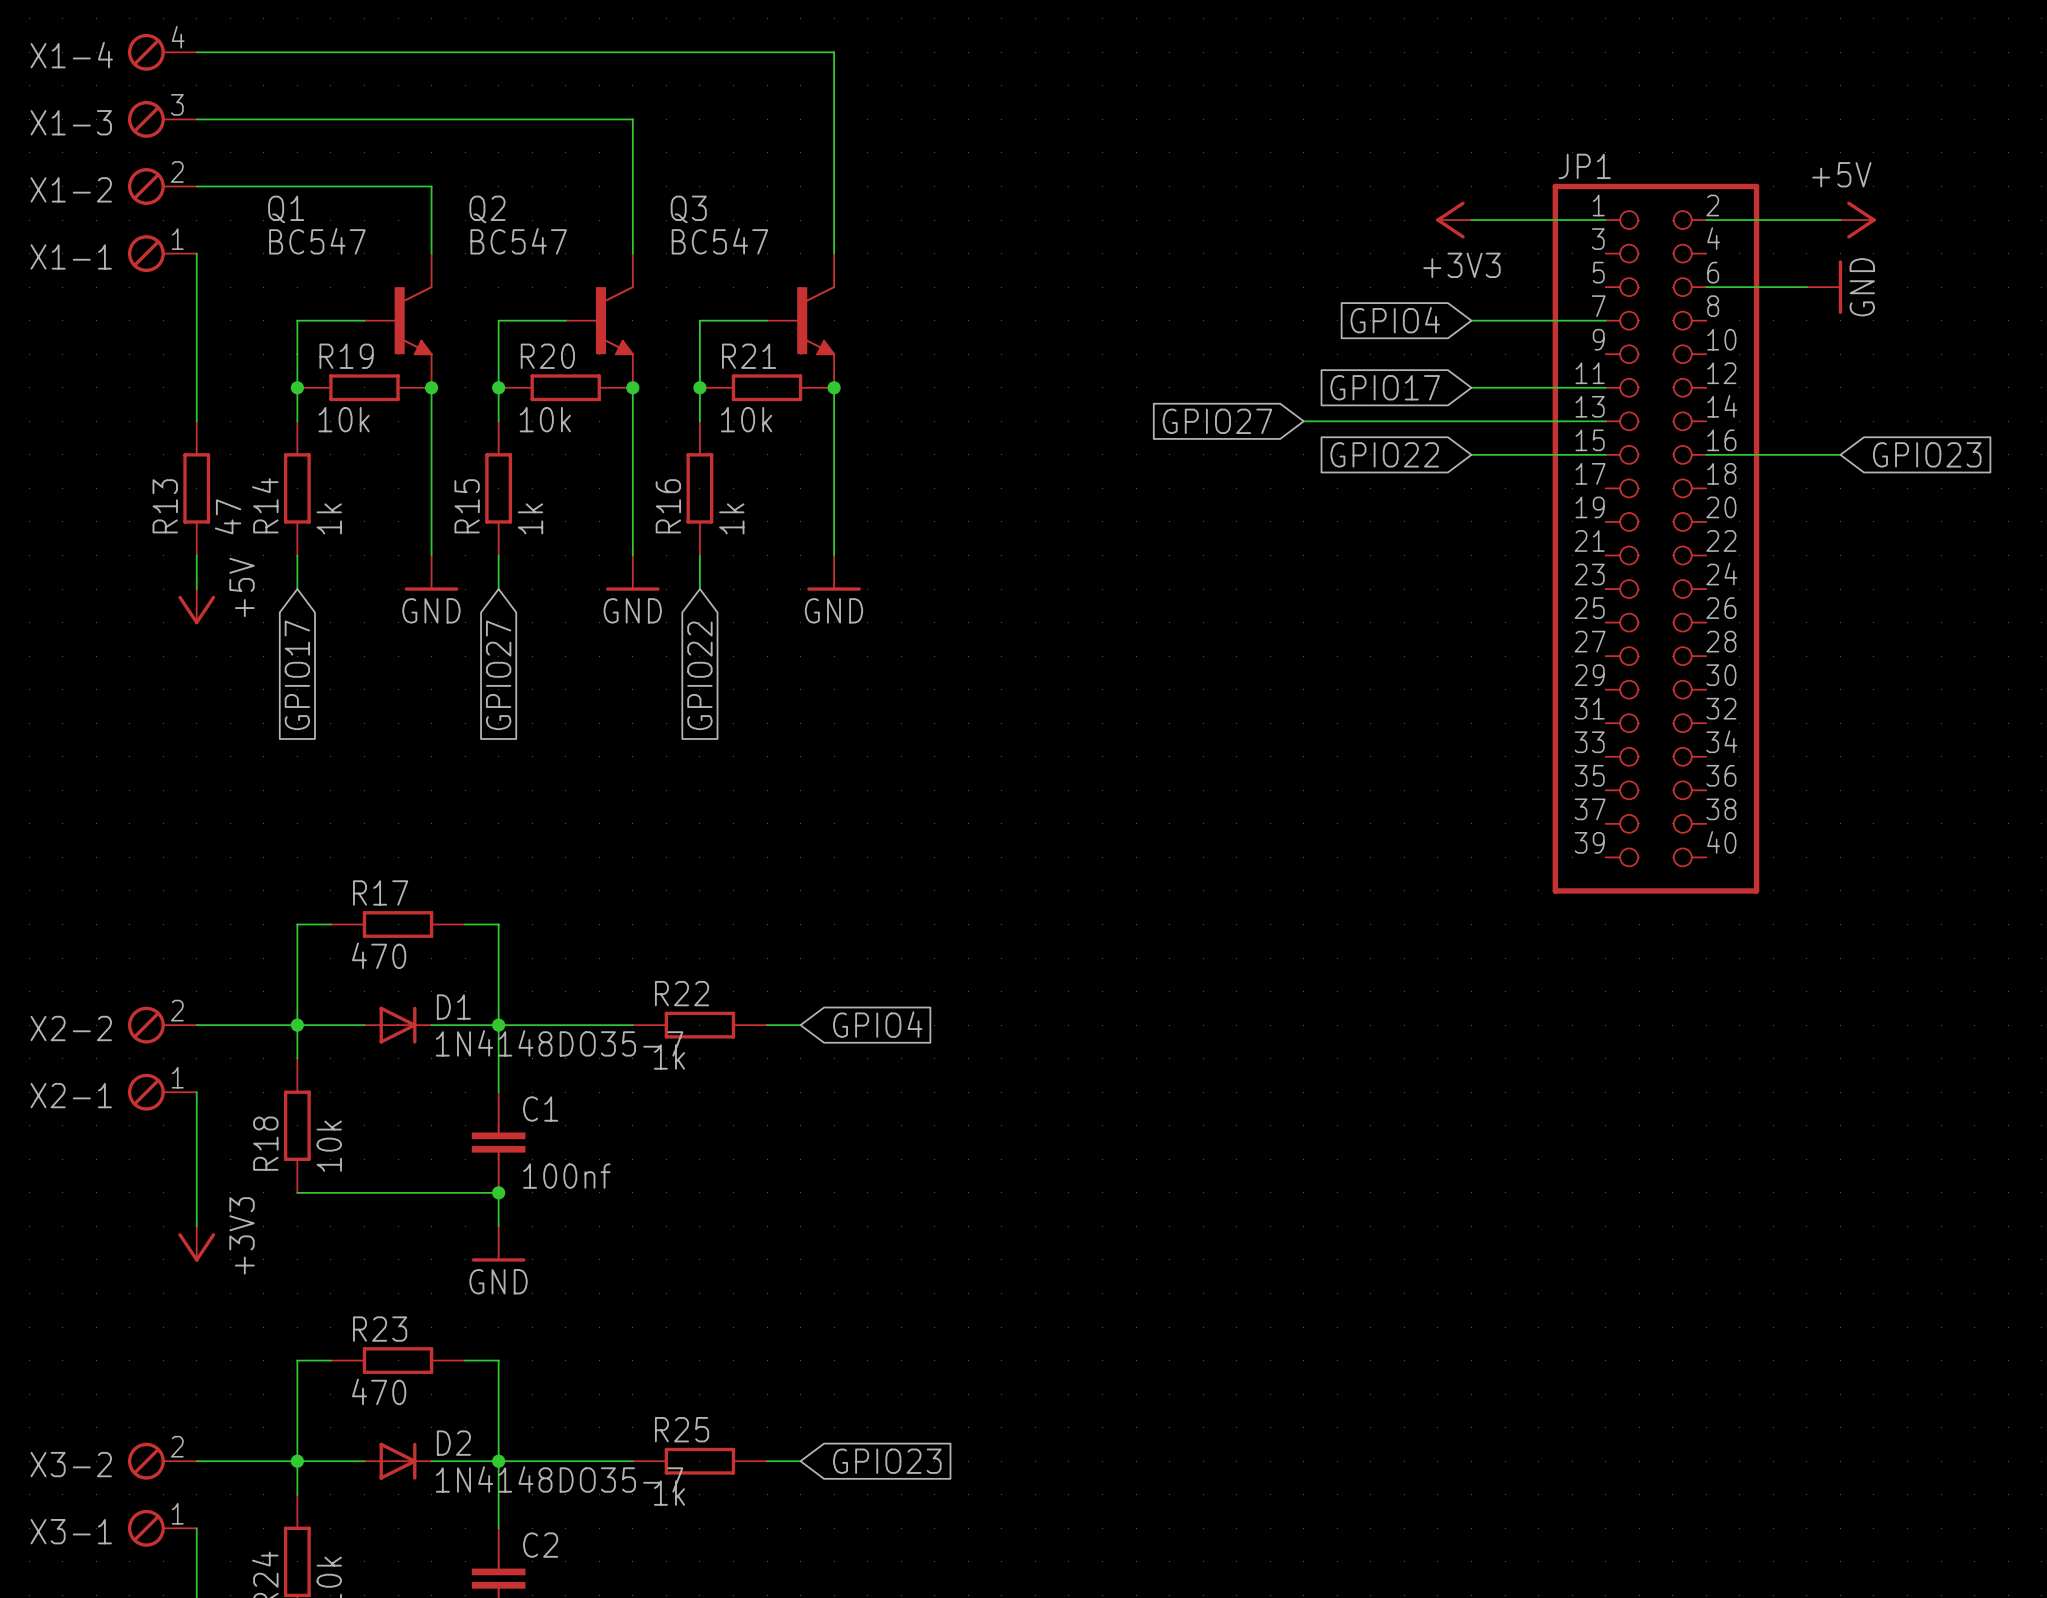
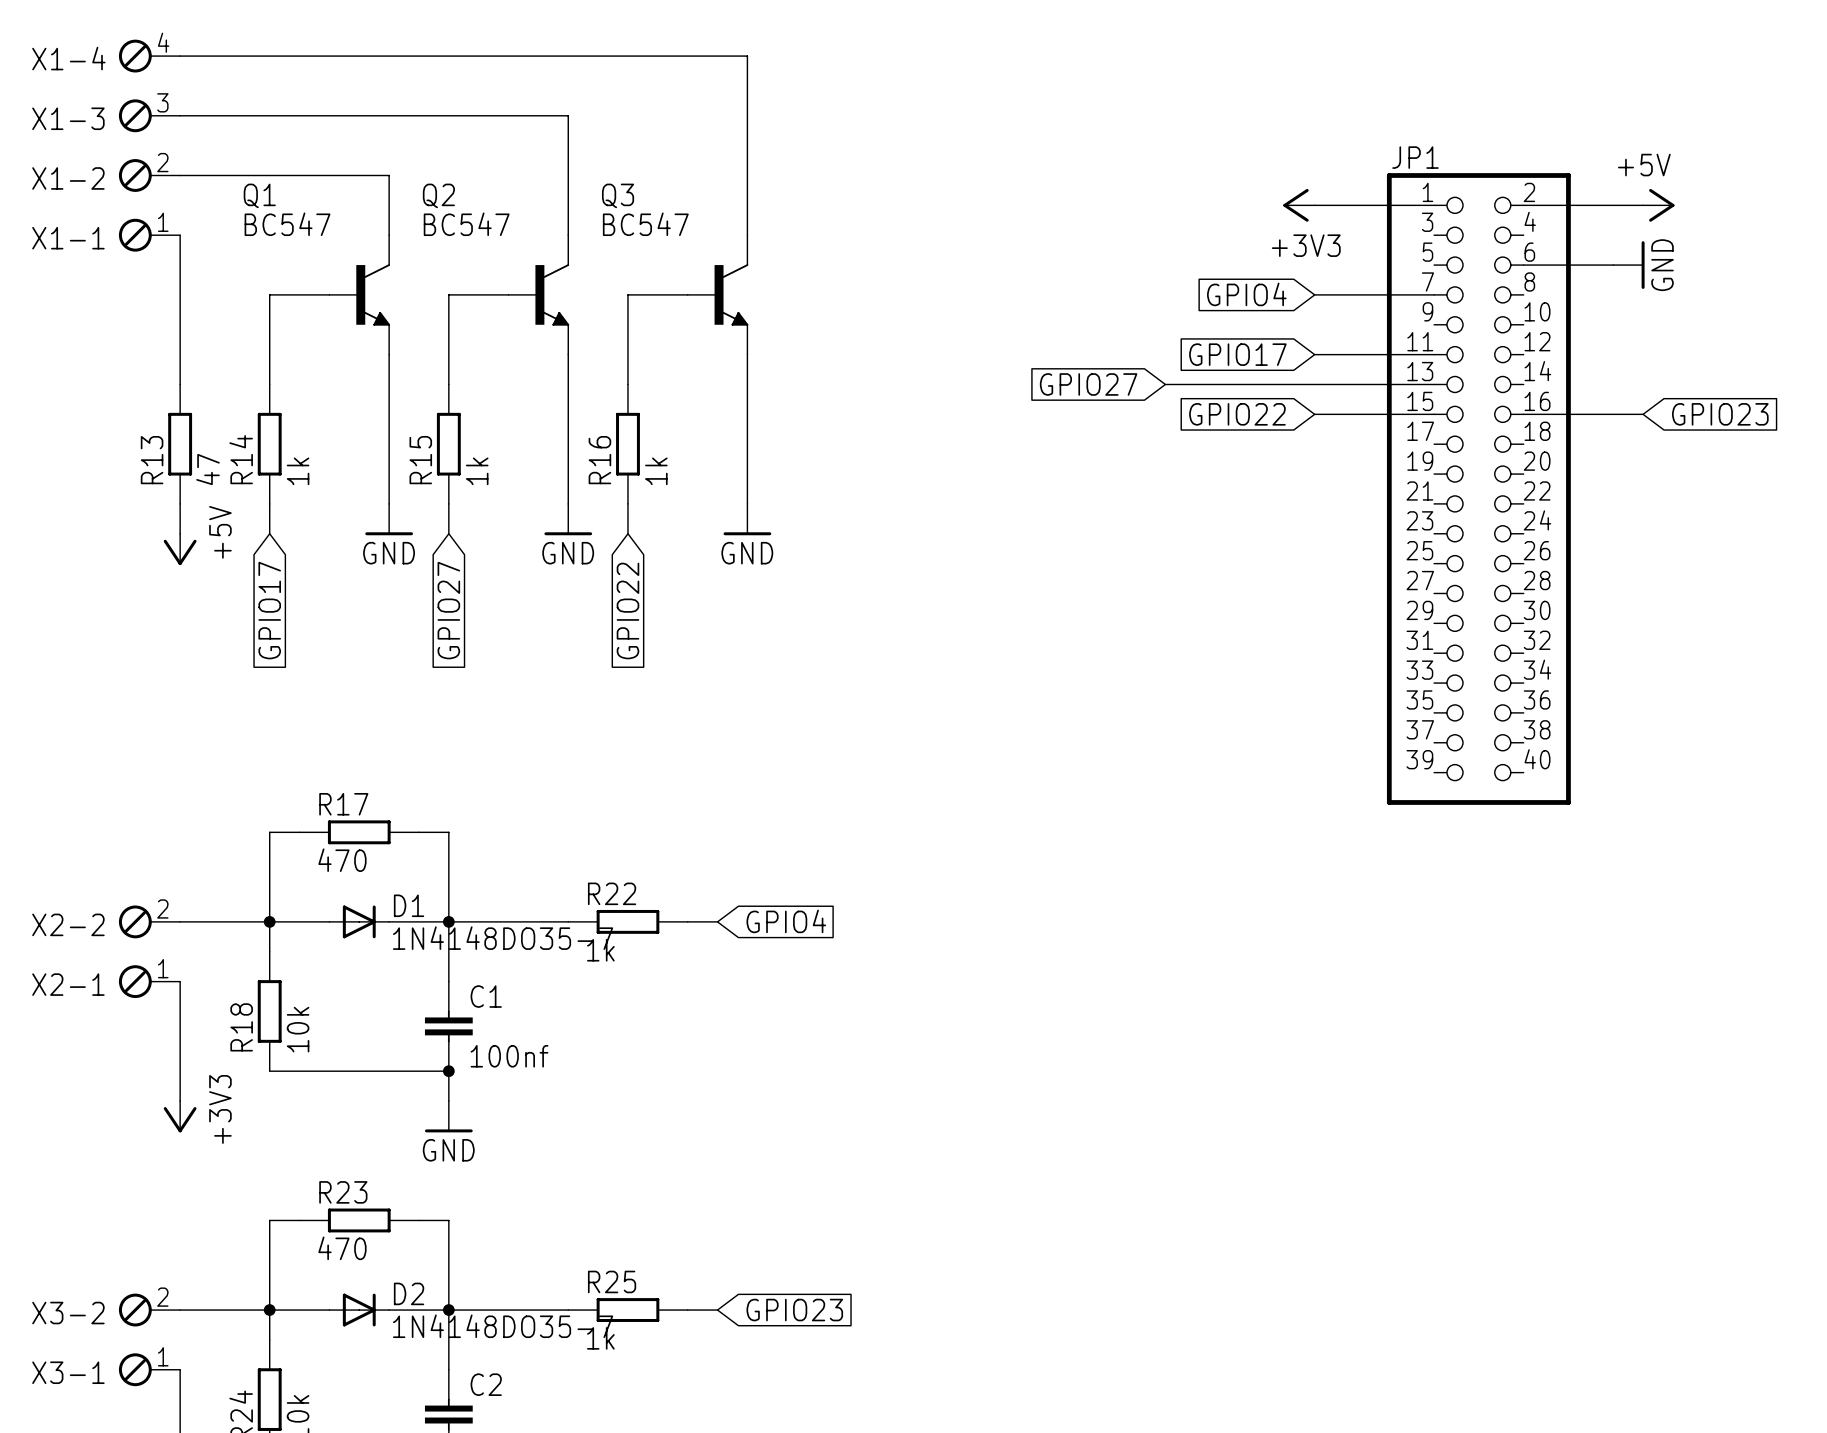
junction: (297, 387) -> none
R19: 10k (364, 387) -> none
junction: (431, 387) -> none
junction: (498, 387) -> none
R20: 10k (565, 387) -> none
junction: (632, 387) -> none
junction: (699, 387) -> none
R21: 10k (767, 387) -> none
junction: (834, 387) -> none

